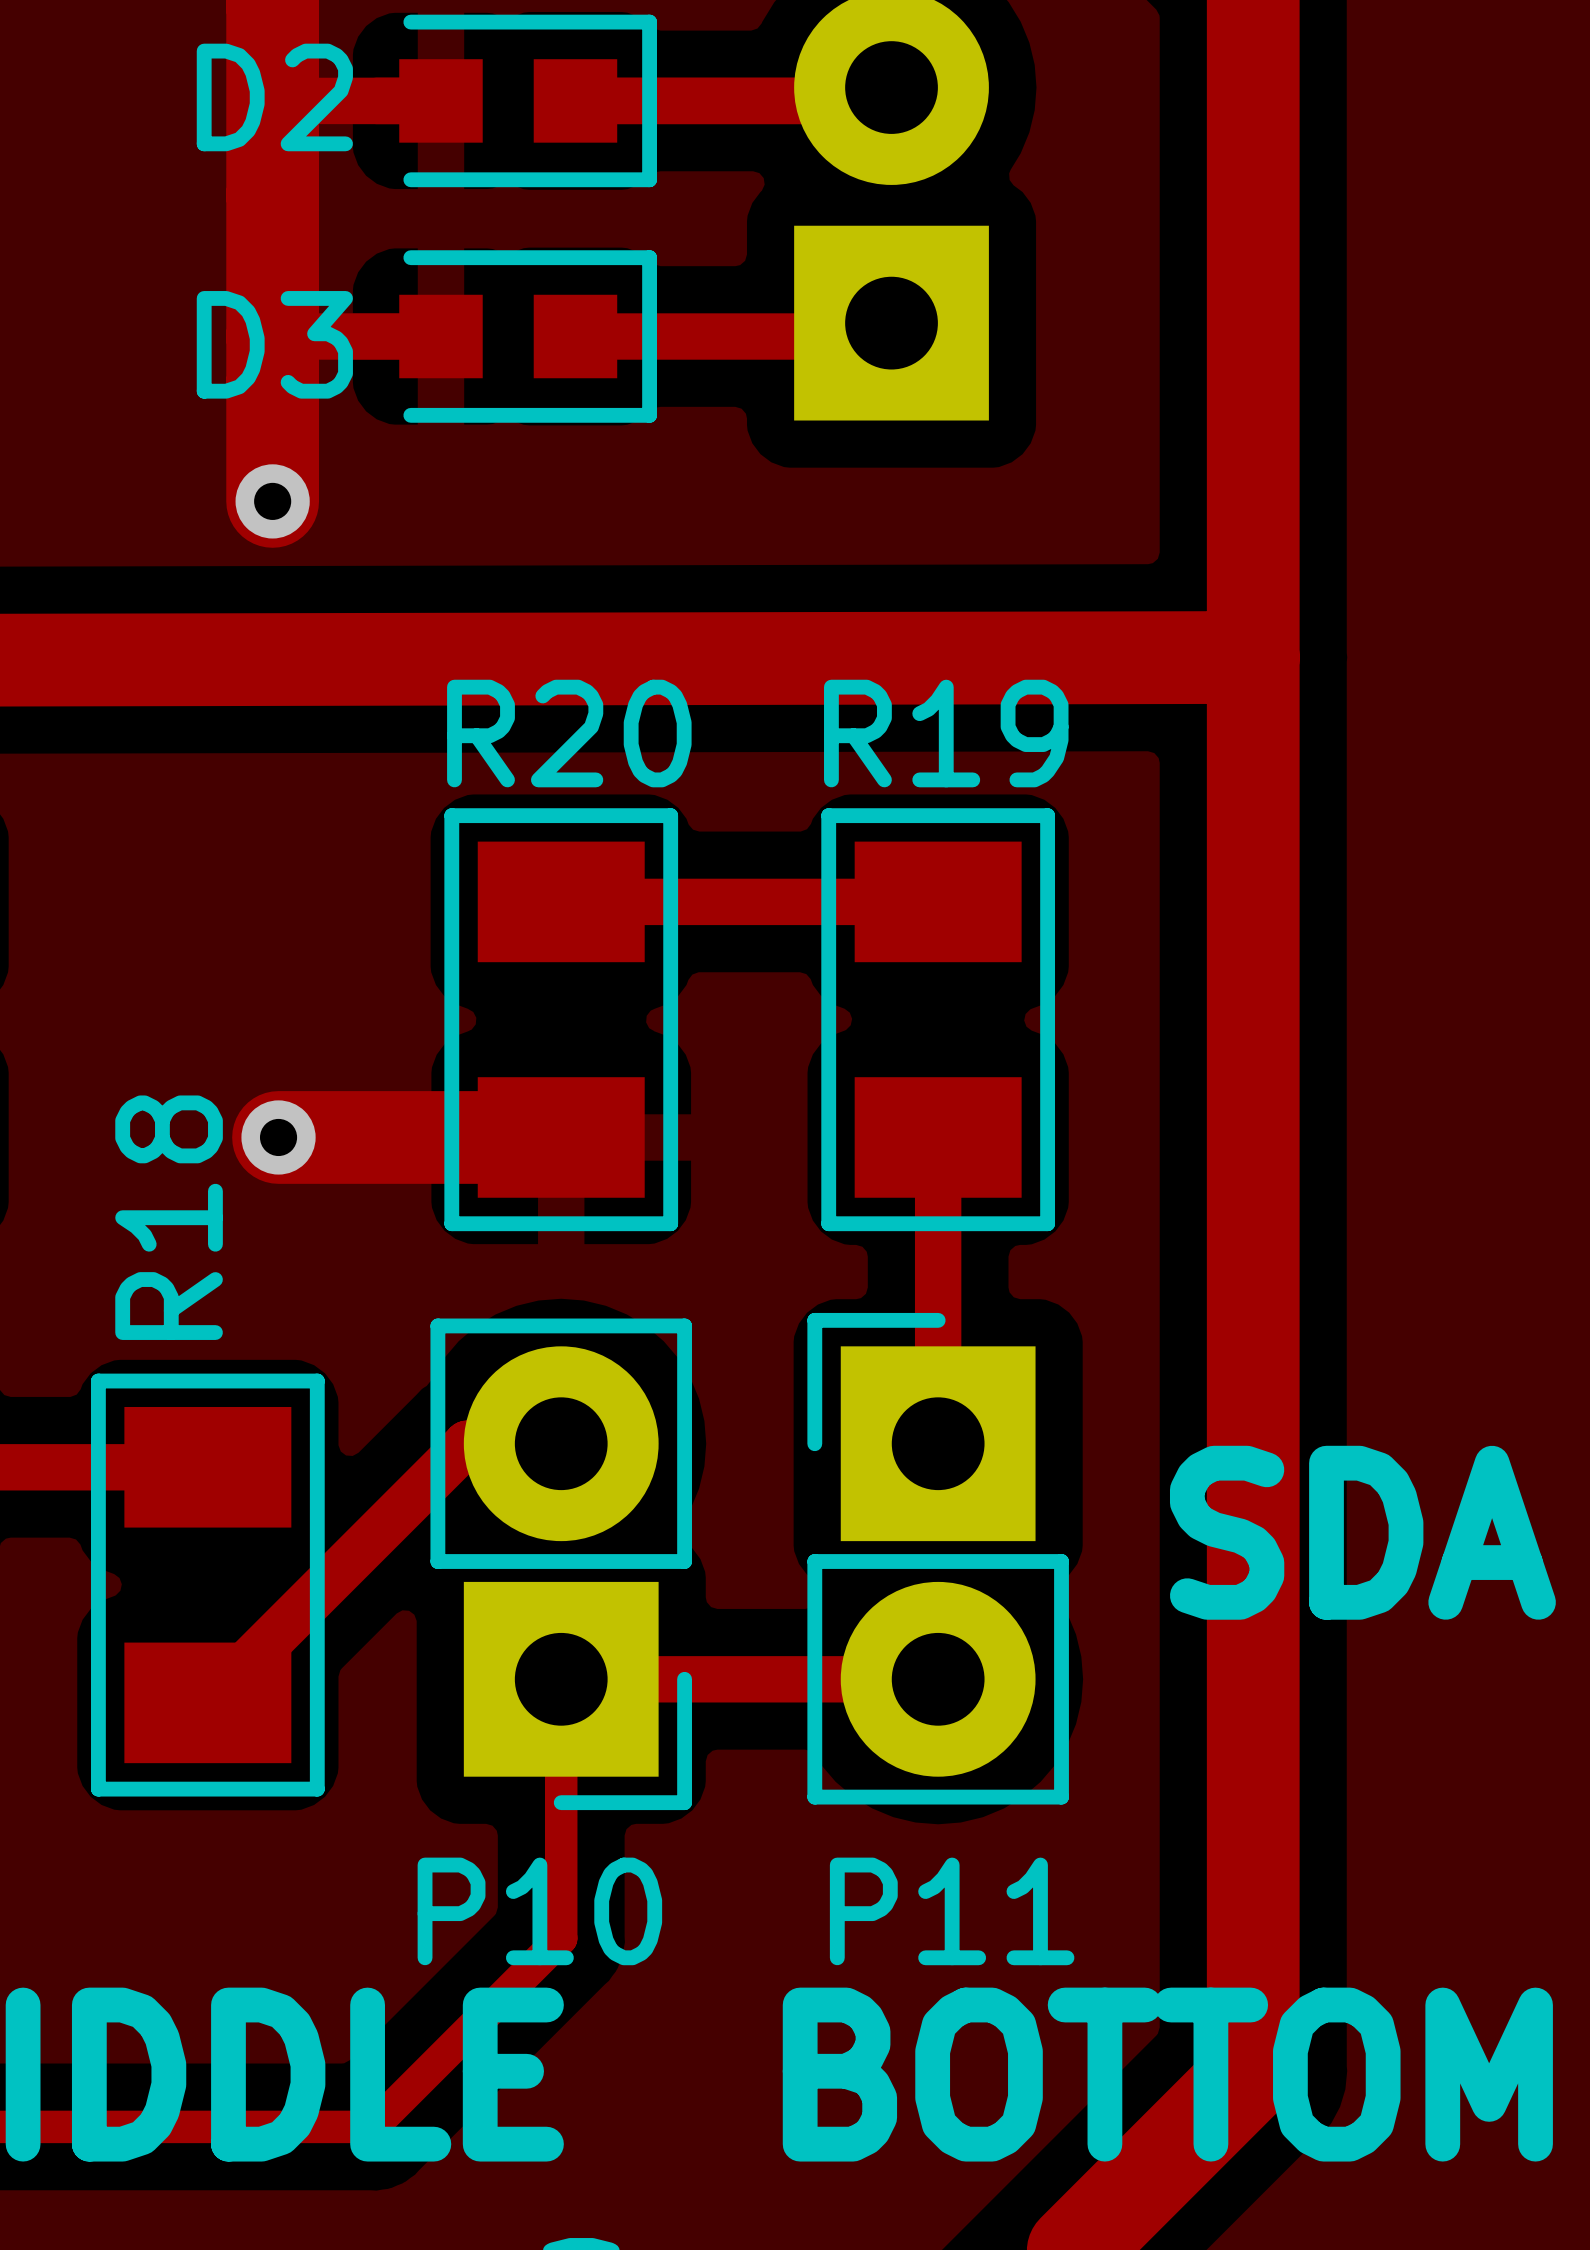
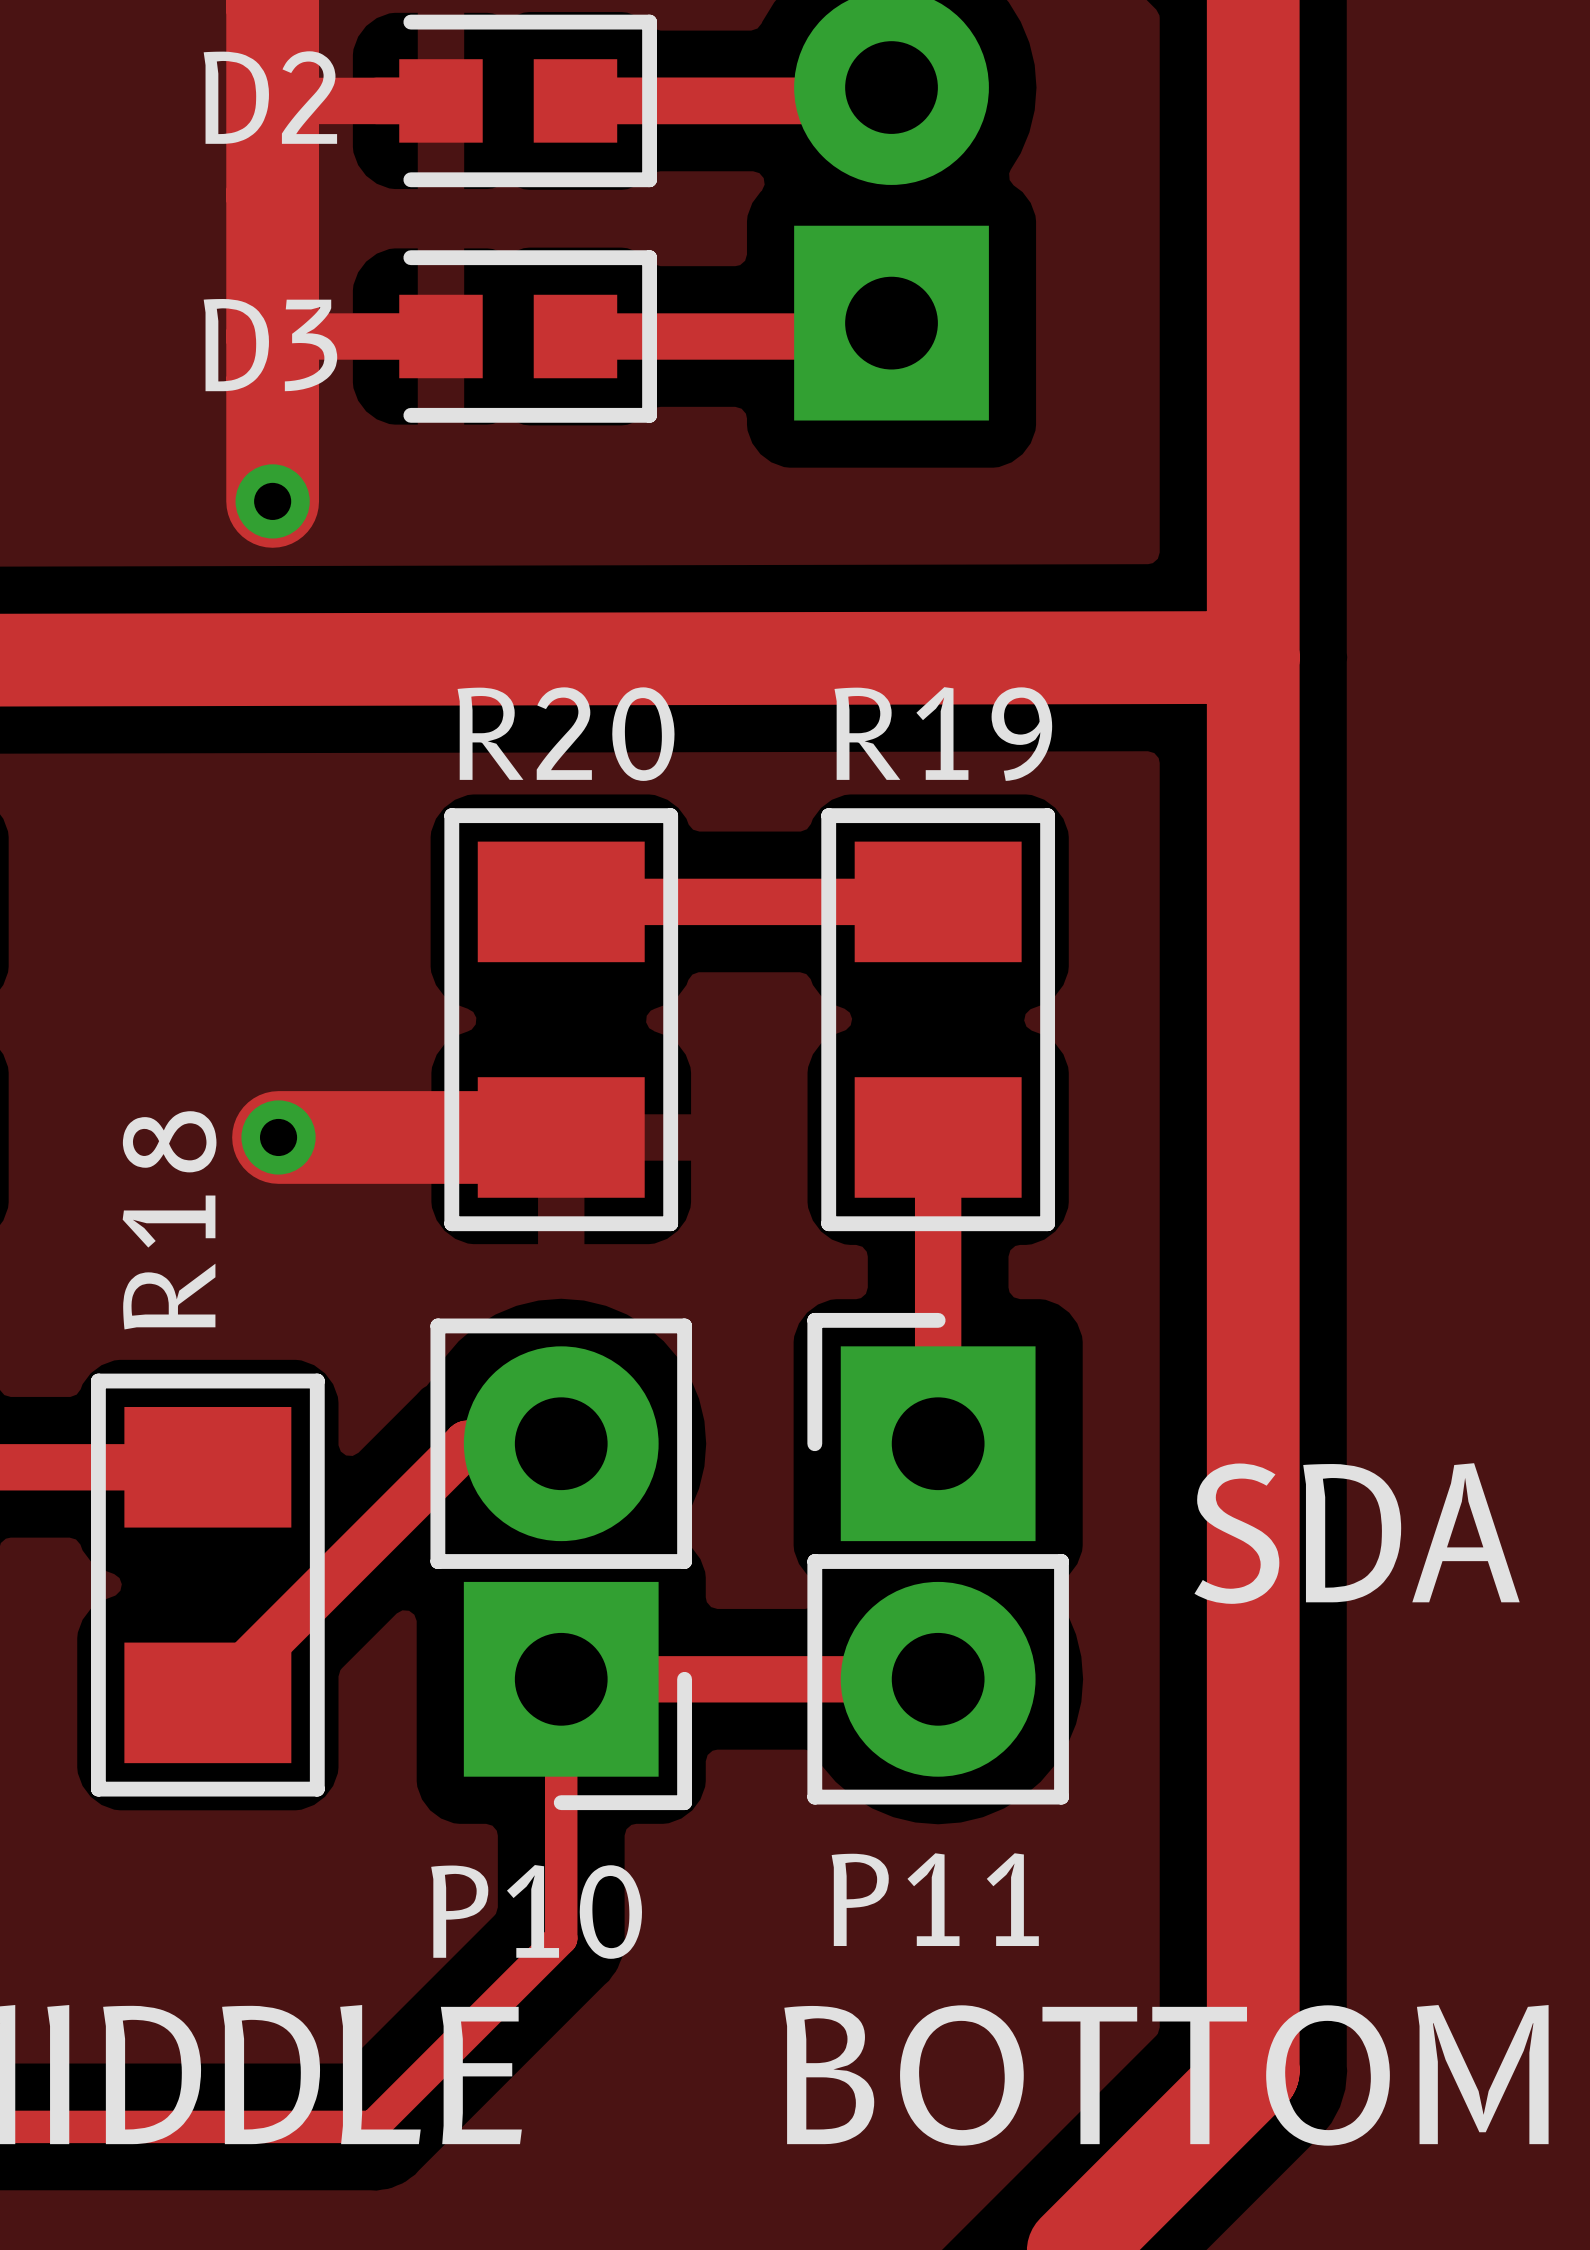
P11 name position: P11 (952, 1911) -> P11 (935, 1899)

